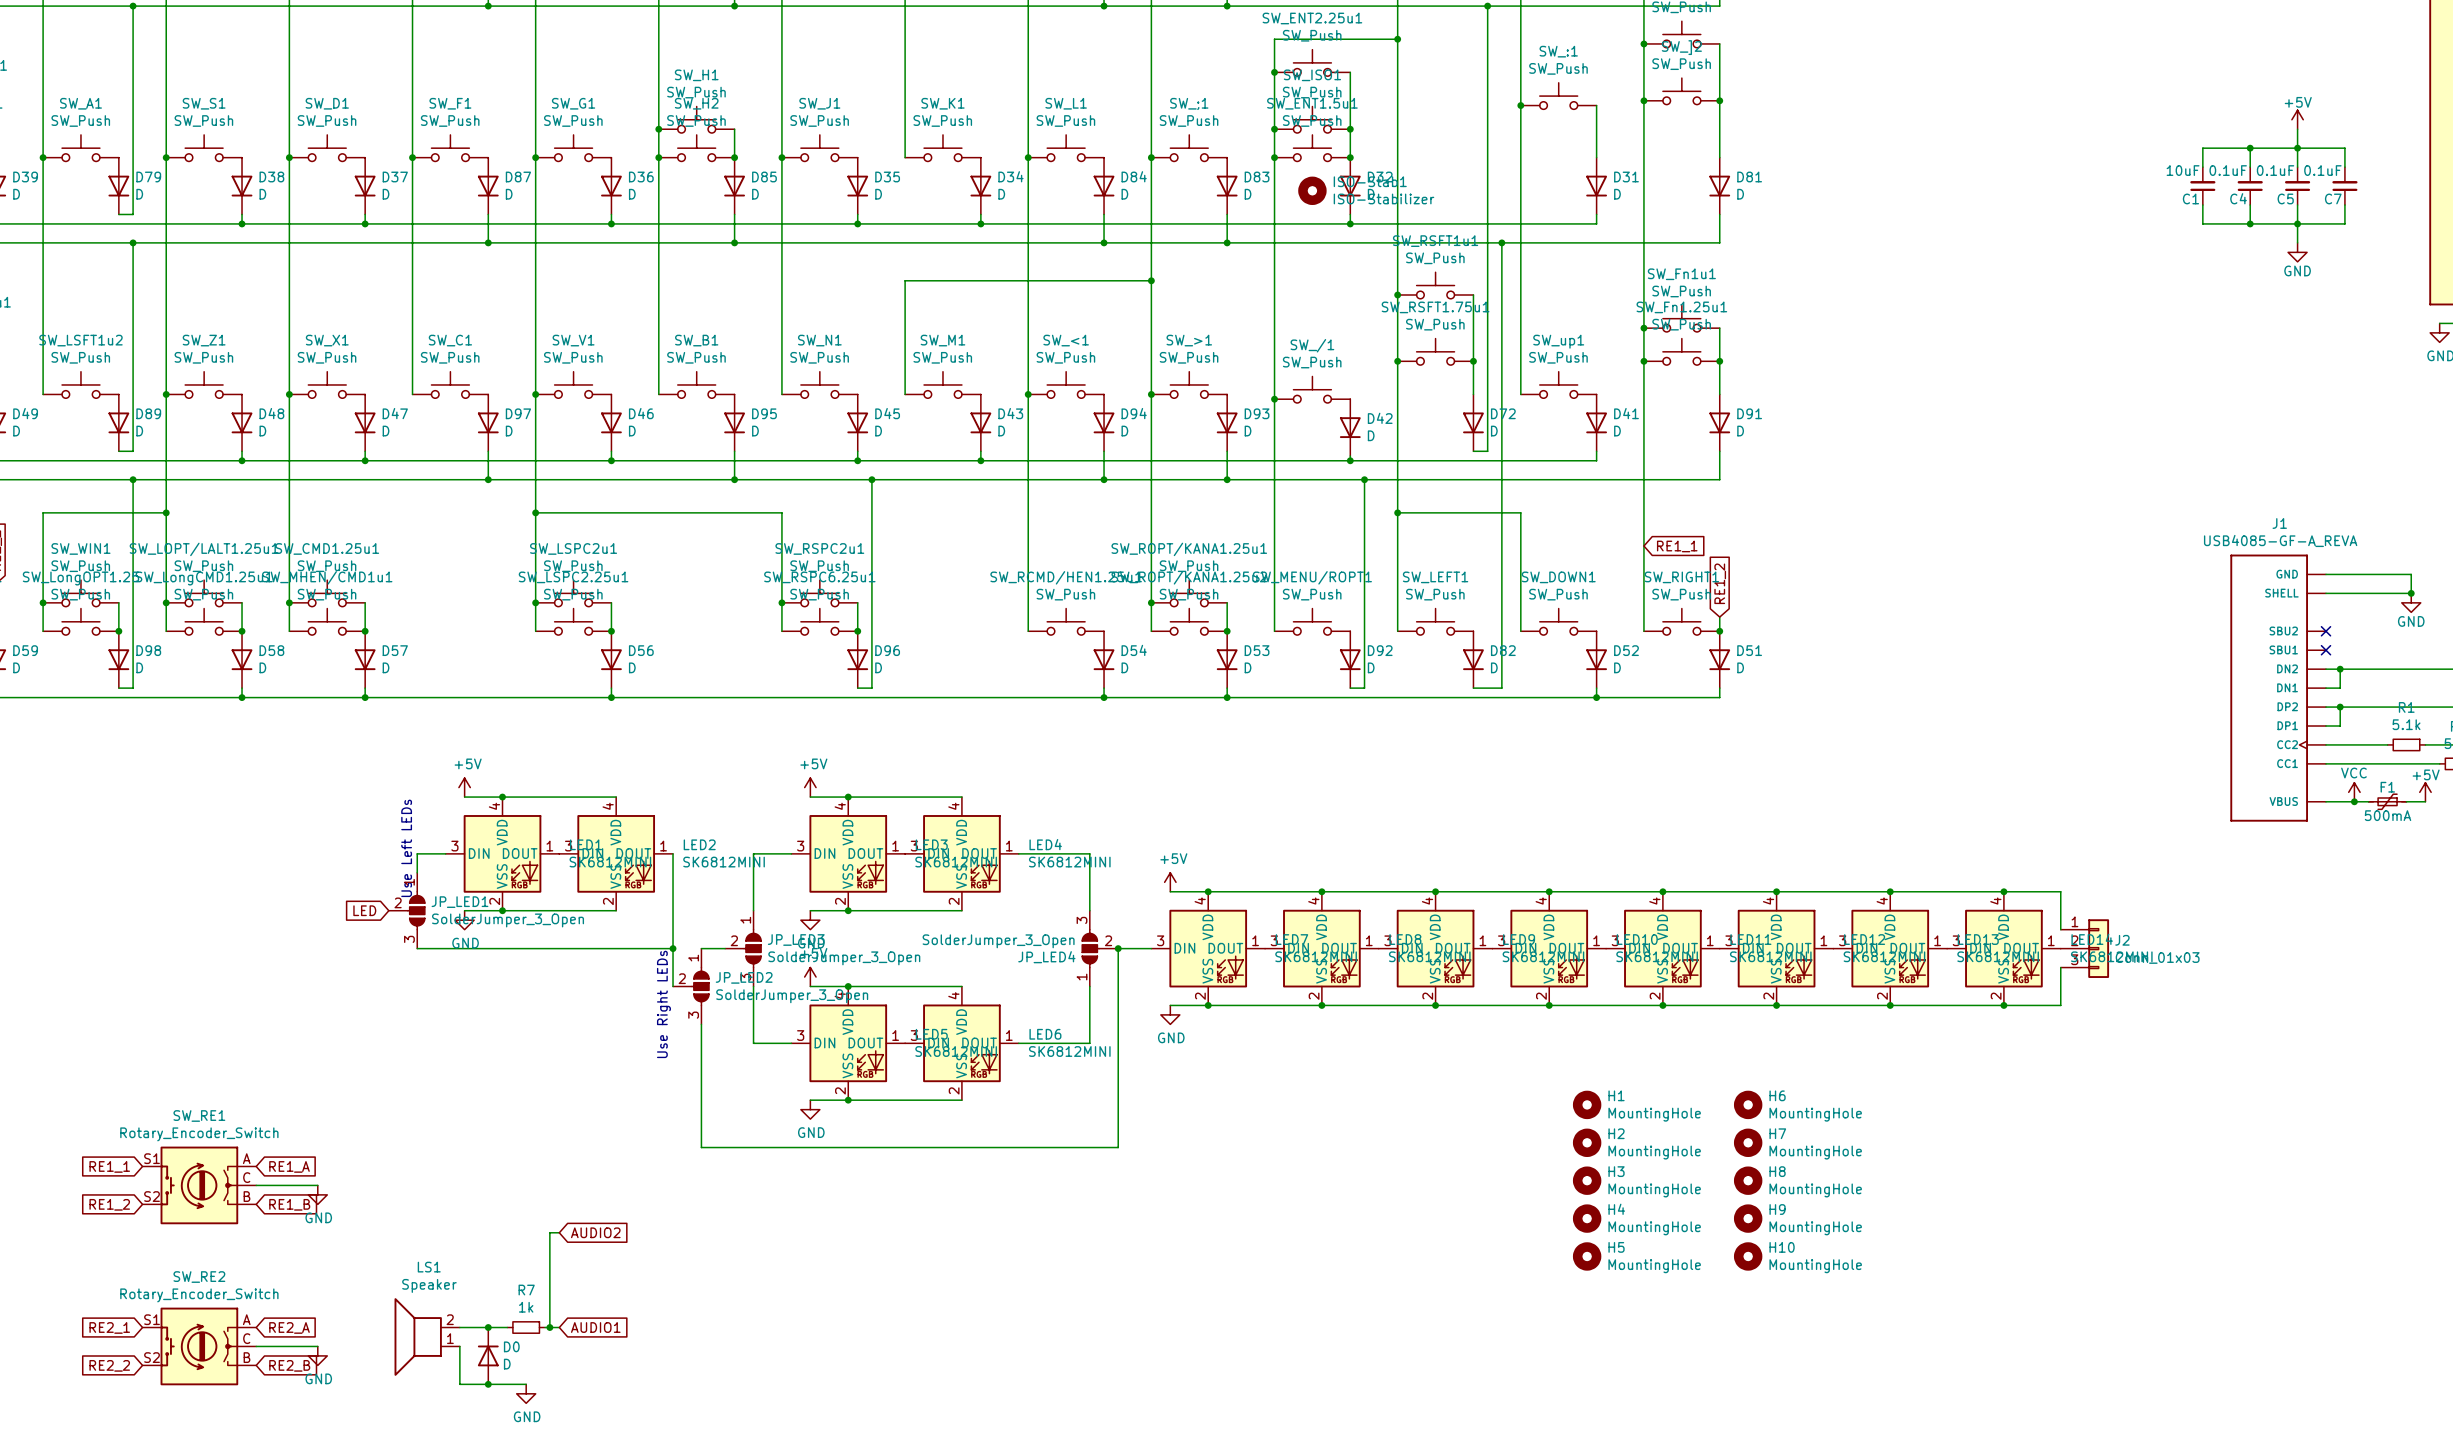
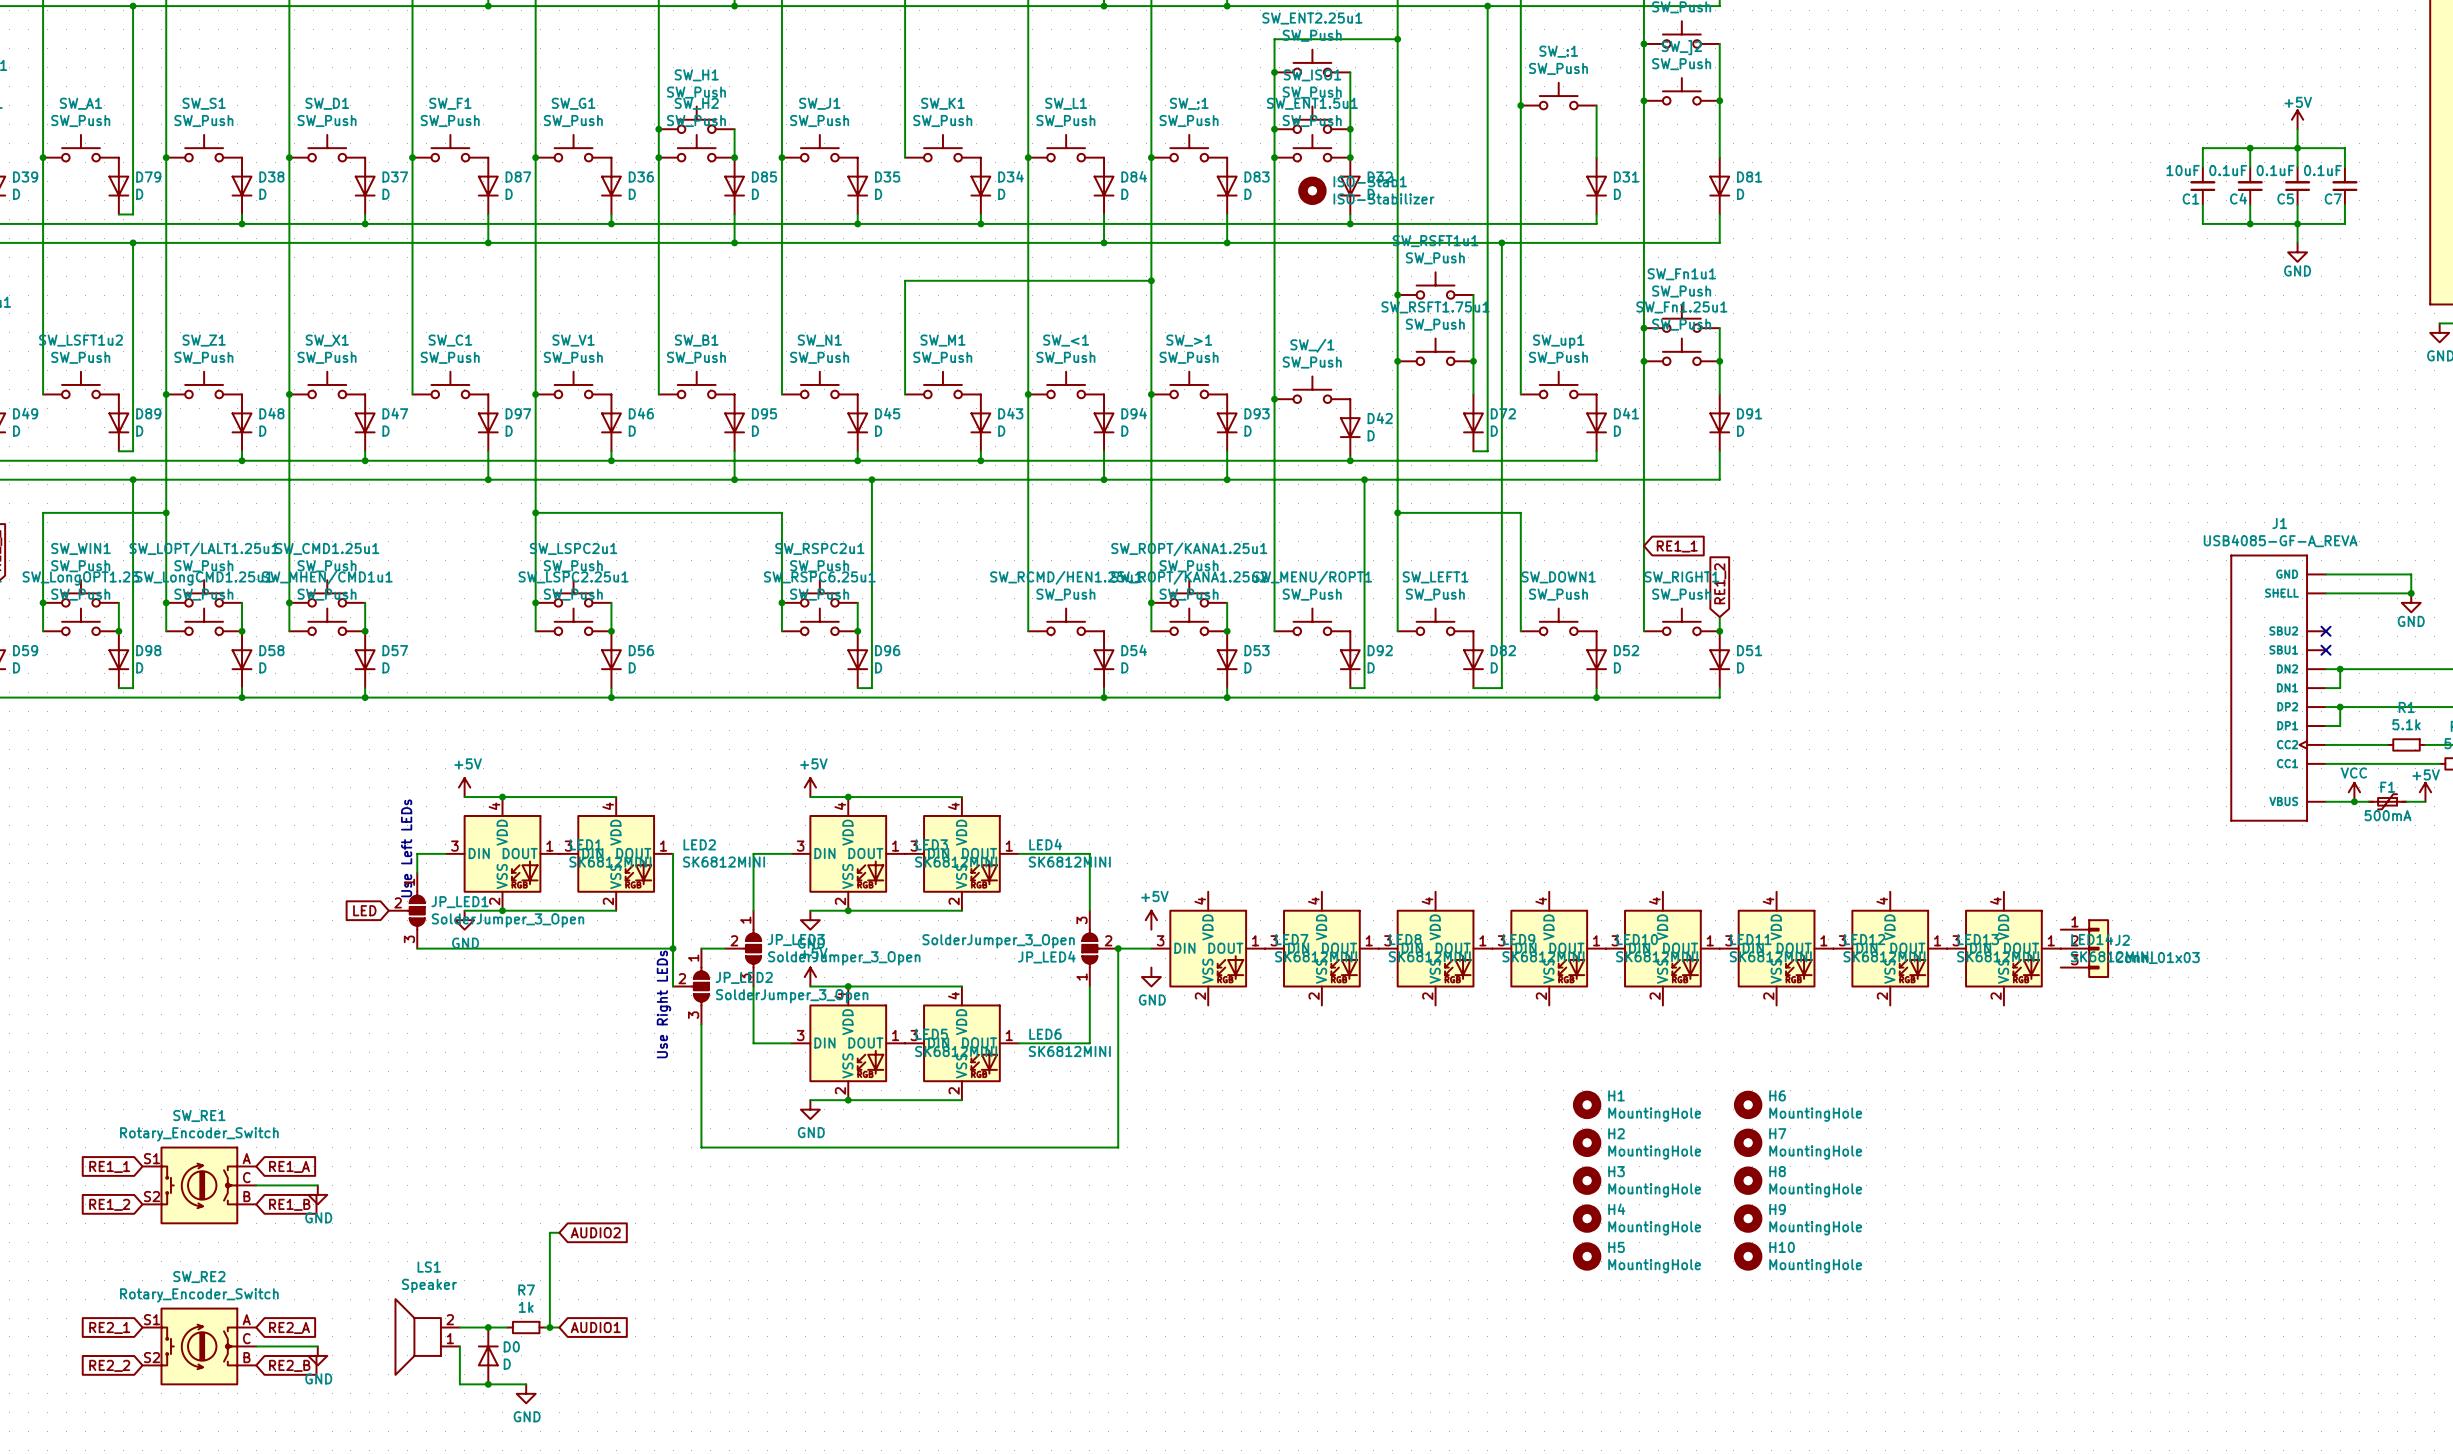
power symbol position: +5V (1170, 882) -> +5V (1151, 920)
wire: (1170, 891) (2060, 891) (2060, 929) -> none
junction: (1208, 891) -> none
junction: (1321, 891) -> none
junction: (1435, 891) -> none
junction: (1549, 891) -> none
junction: (1662, 891) -> none
junction: (1776, 891) -> none
junction: (1890, 891) -> none
junction: (2003, 891) -> none
wire: (2060, 967) (2060, 1005) (1170, 1005) -> none
junction: (1208, 1005) -> none
junction: (1321, 1005) -> none
junction: (1435, 1005) -> none
junction: (1549, 1005) -> none
junction: (1662, 1005) -> none
junction: (1776, 1005) -> none
junction: (1890, 1005) -> none
junction: (2003, 1005) -> none
power symbol position: GND (1170, 1014) -> GND (1151, 977)

